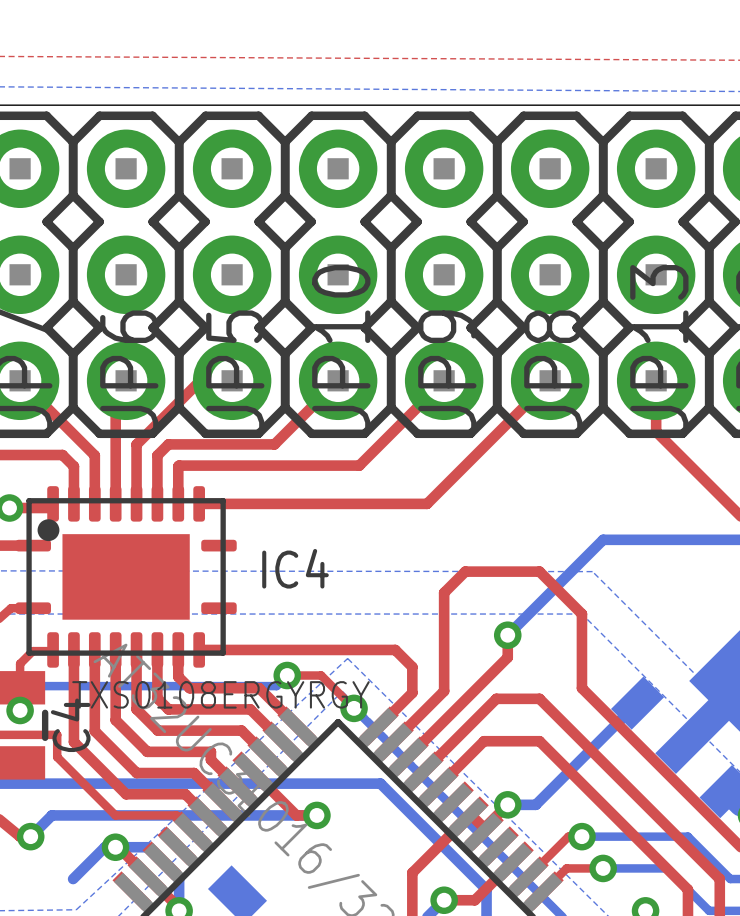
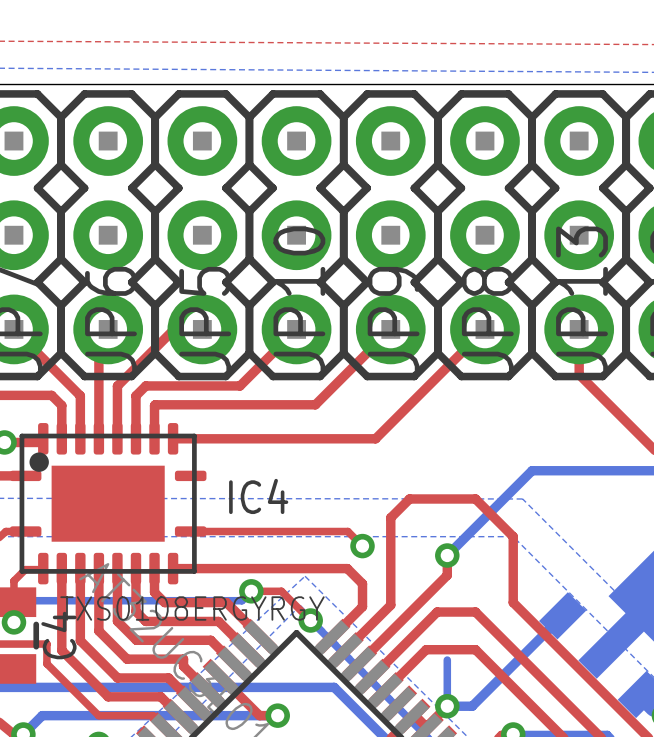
top track: none -> (190, 531) (347, 531) (362, 546)
via: none -> (362, 546)
bottom track: none -> (447, 660) (447, 706)

